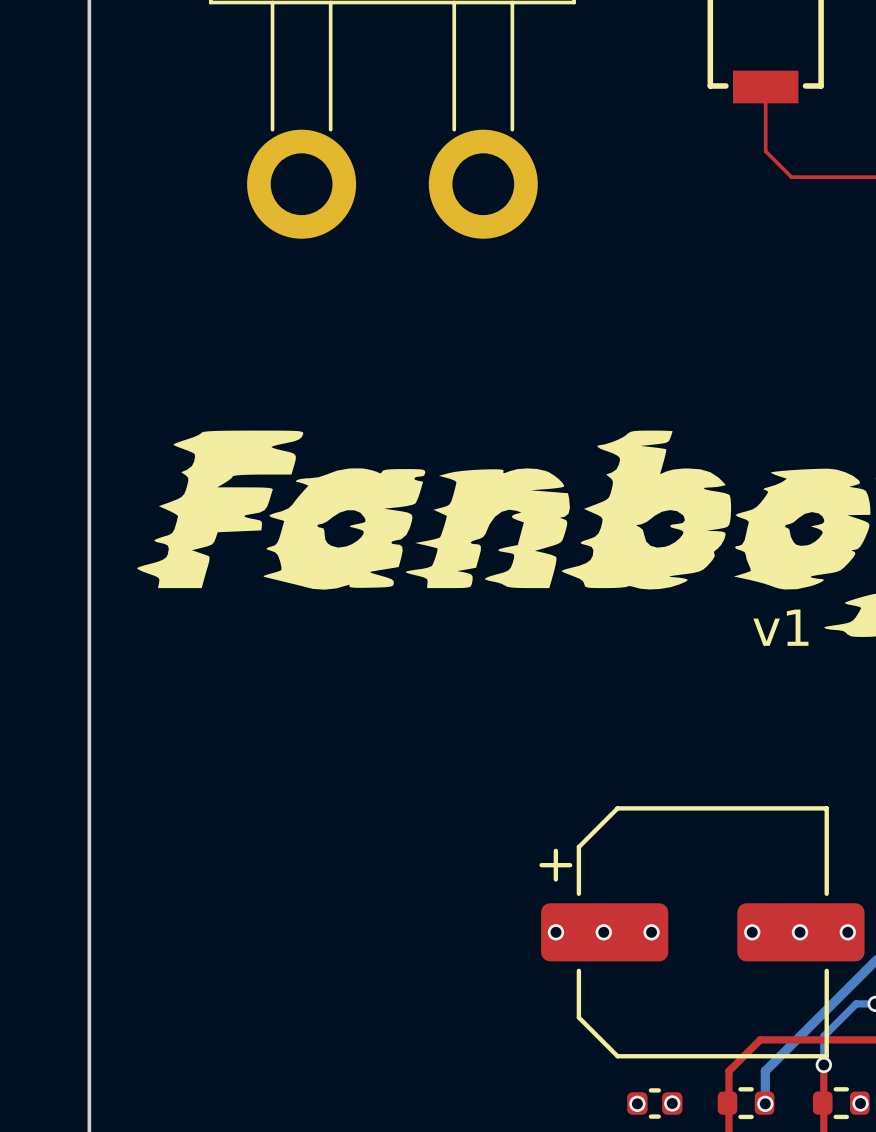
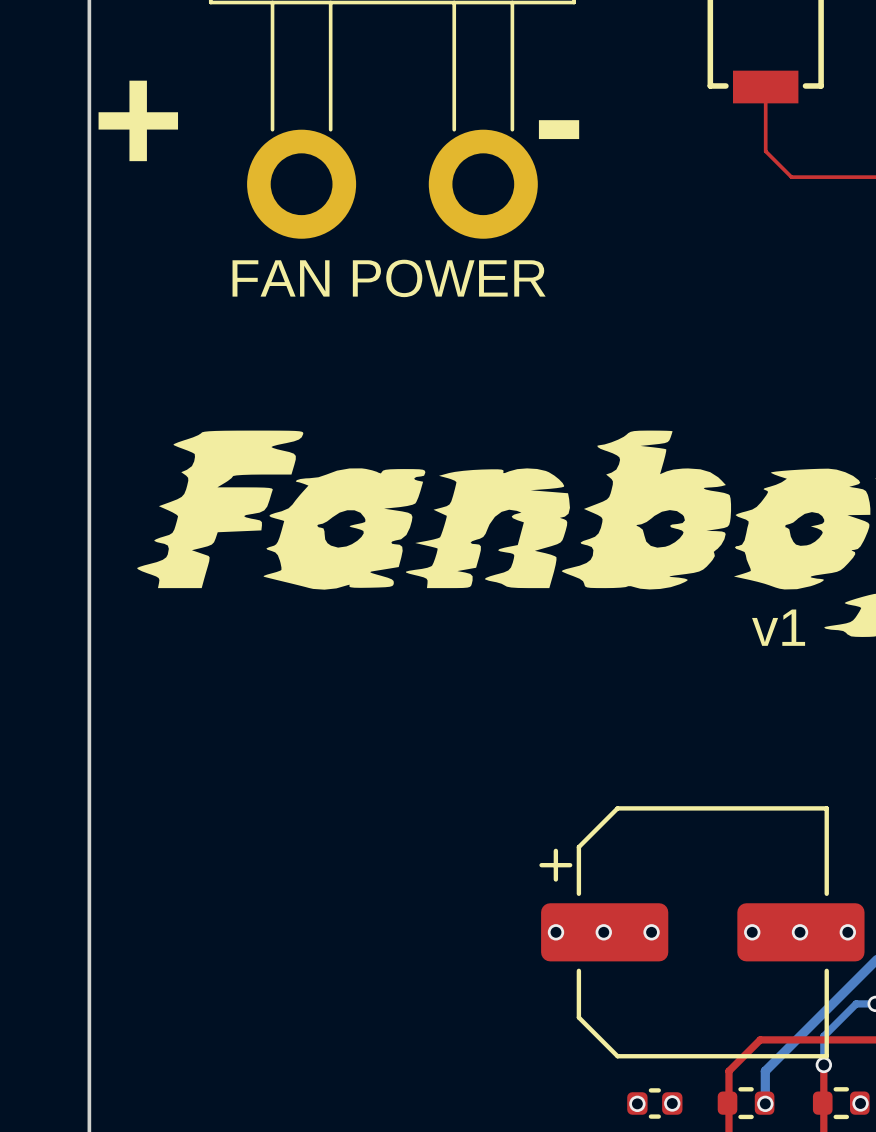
text: none -> + (138, 120)
text: none -> - (559, 129)
text: none -> FAN POWER (389, 278)

